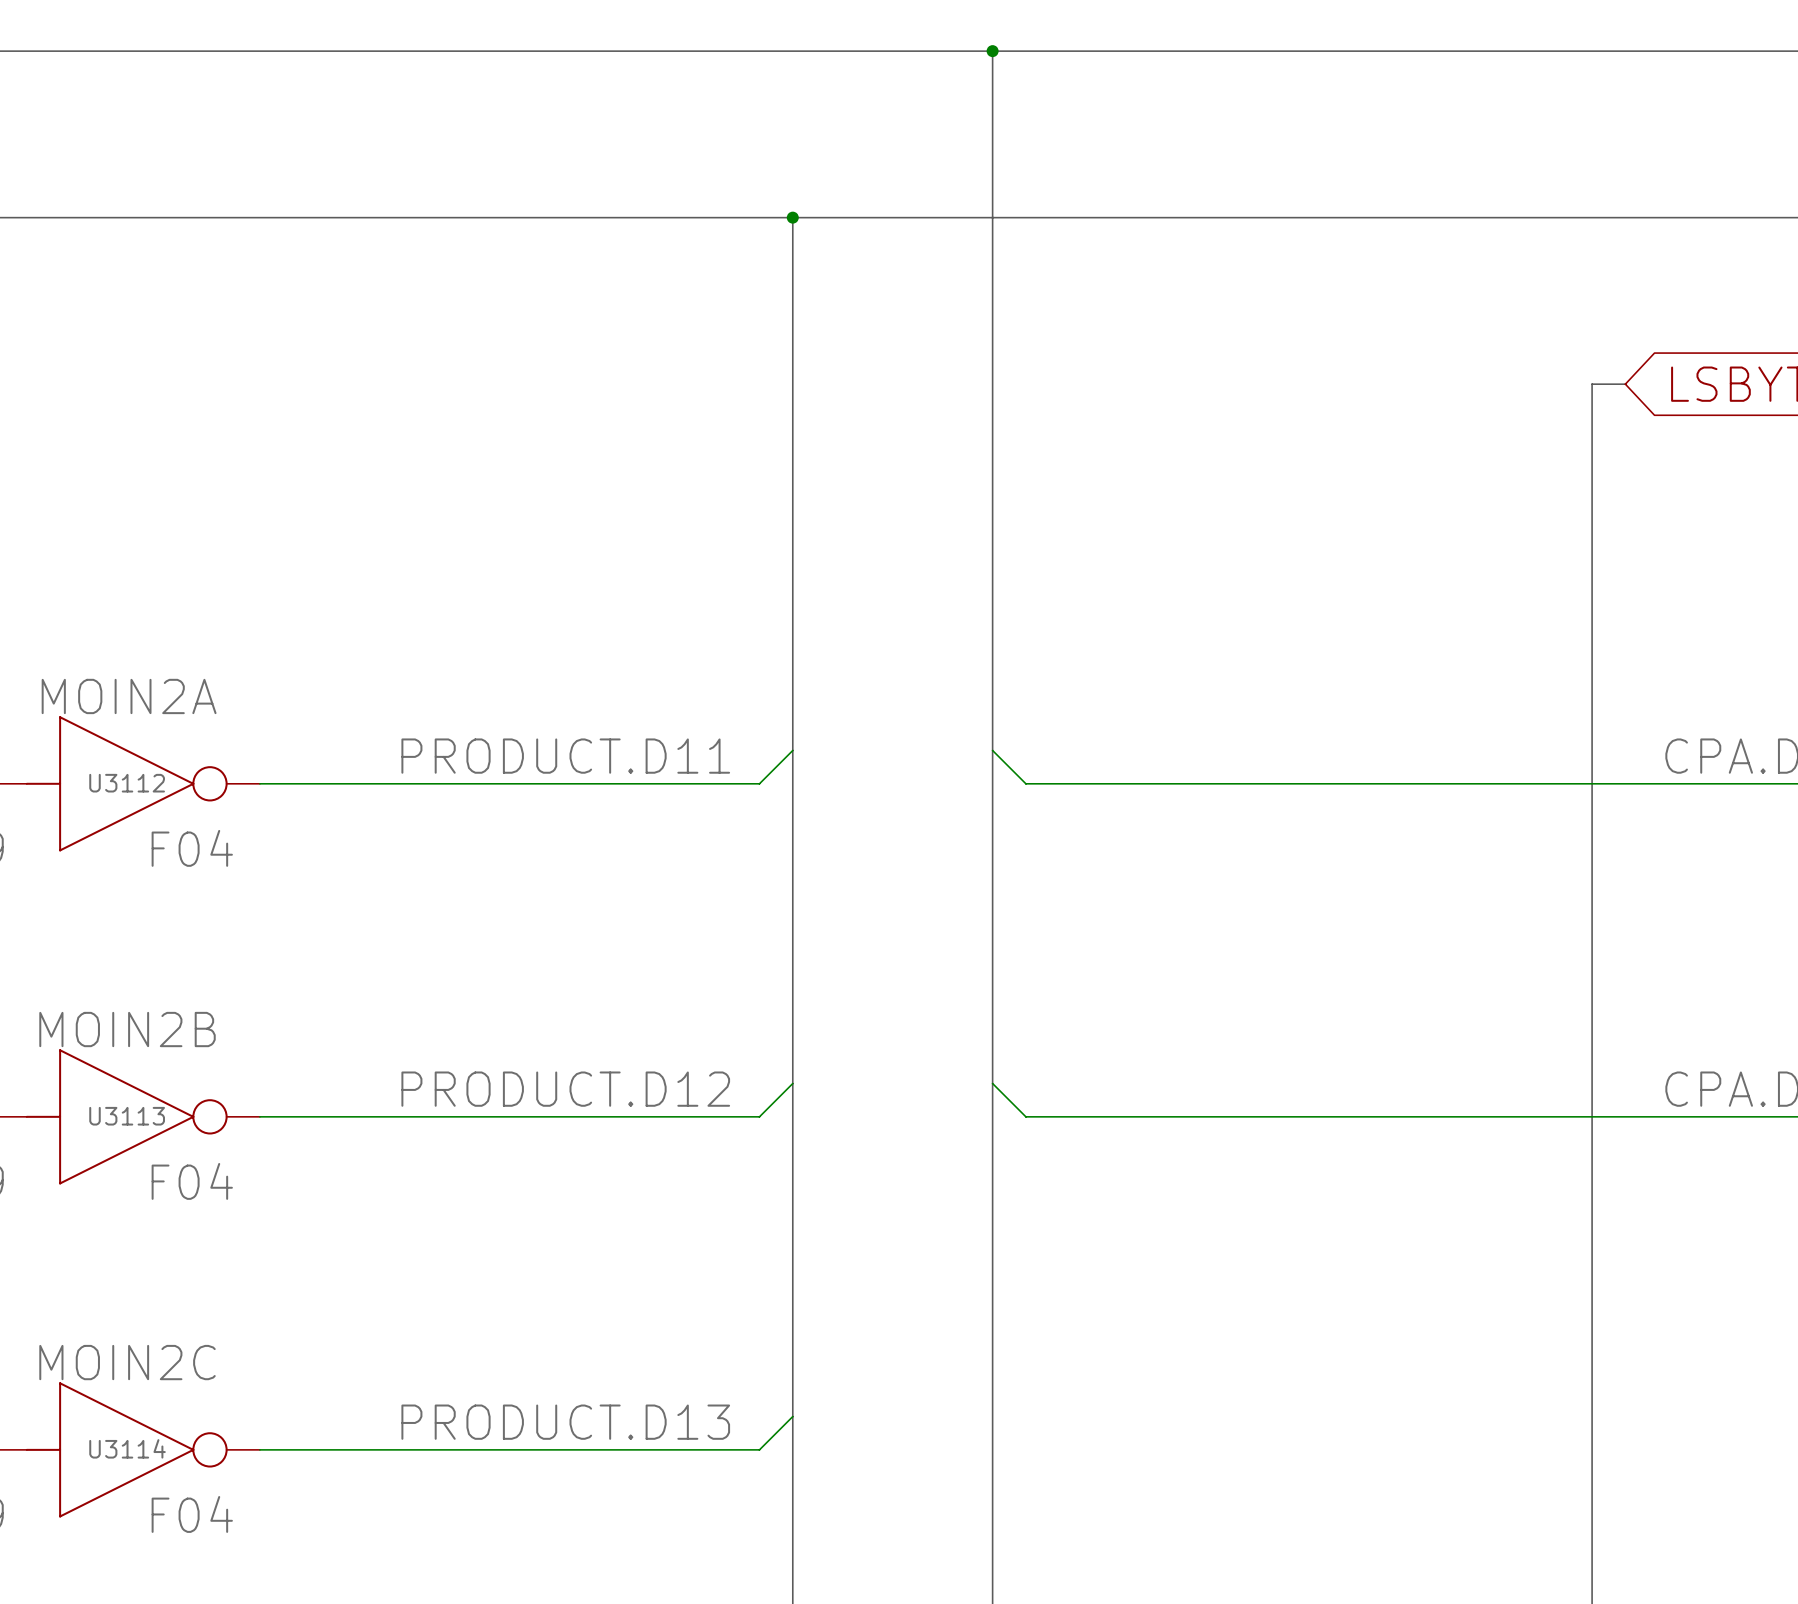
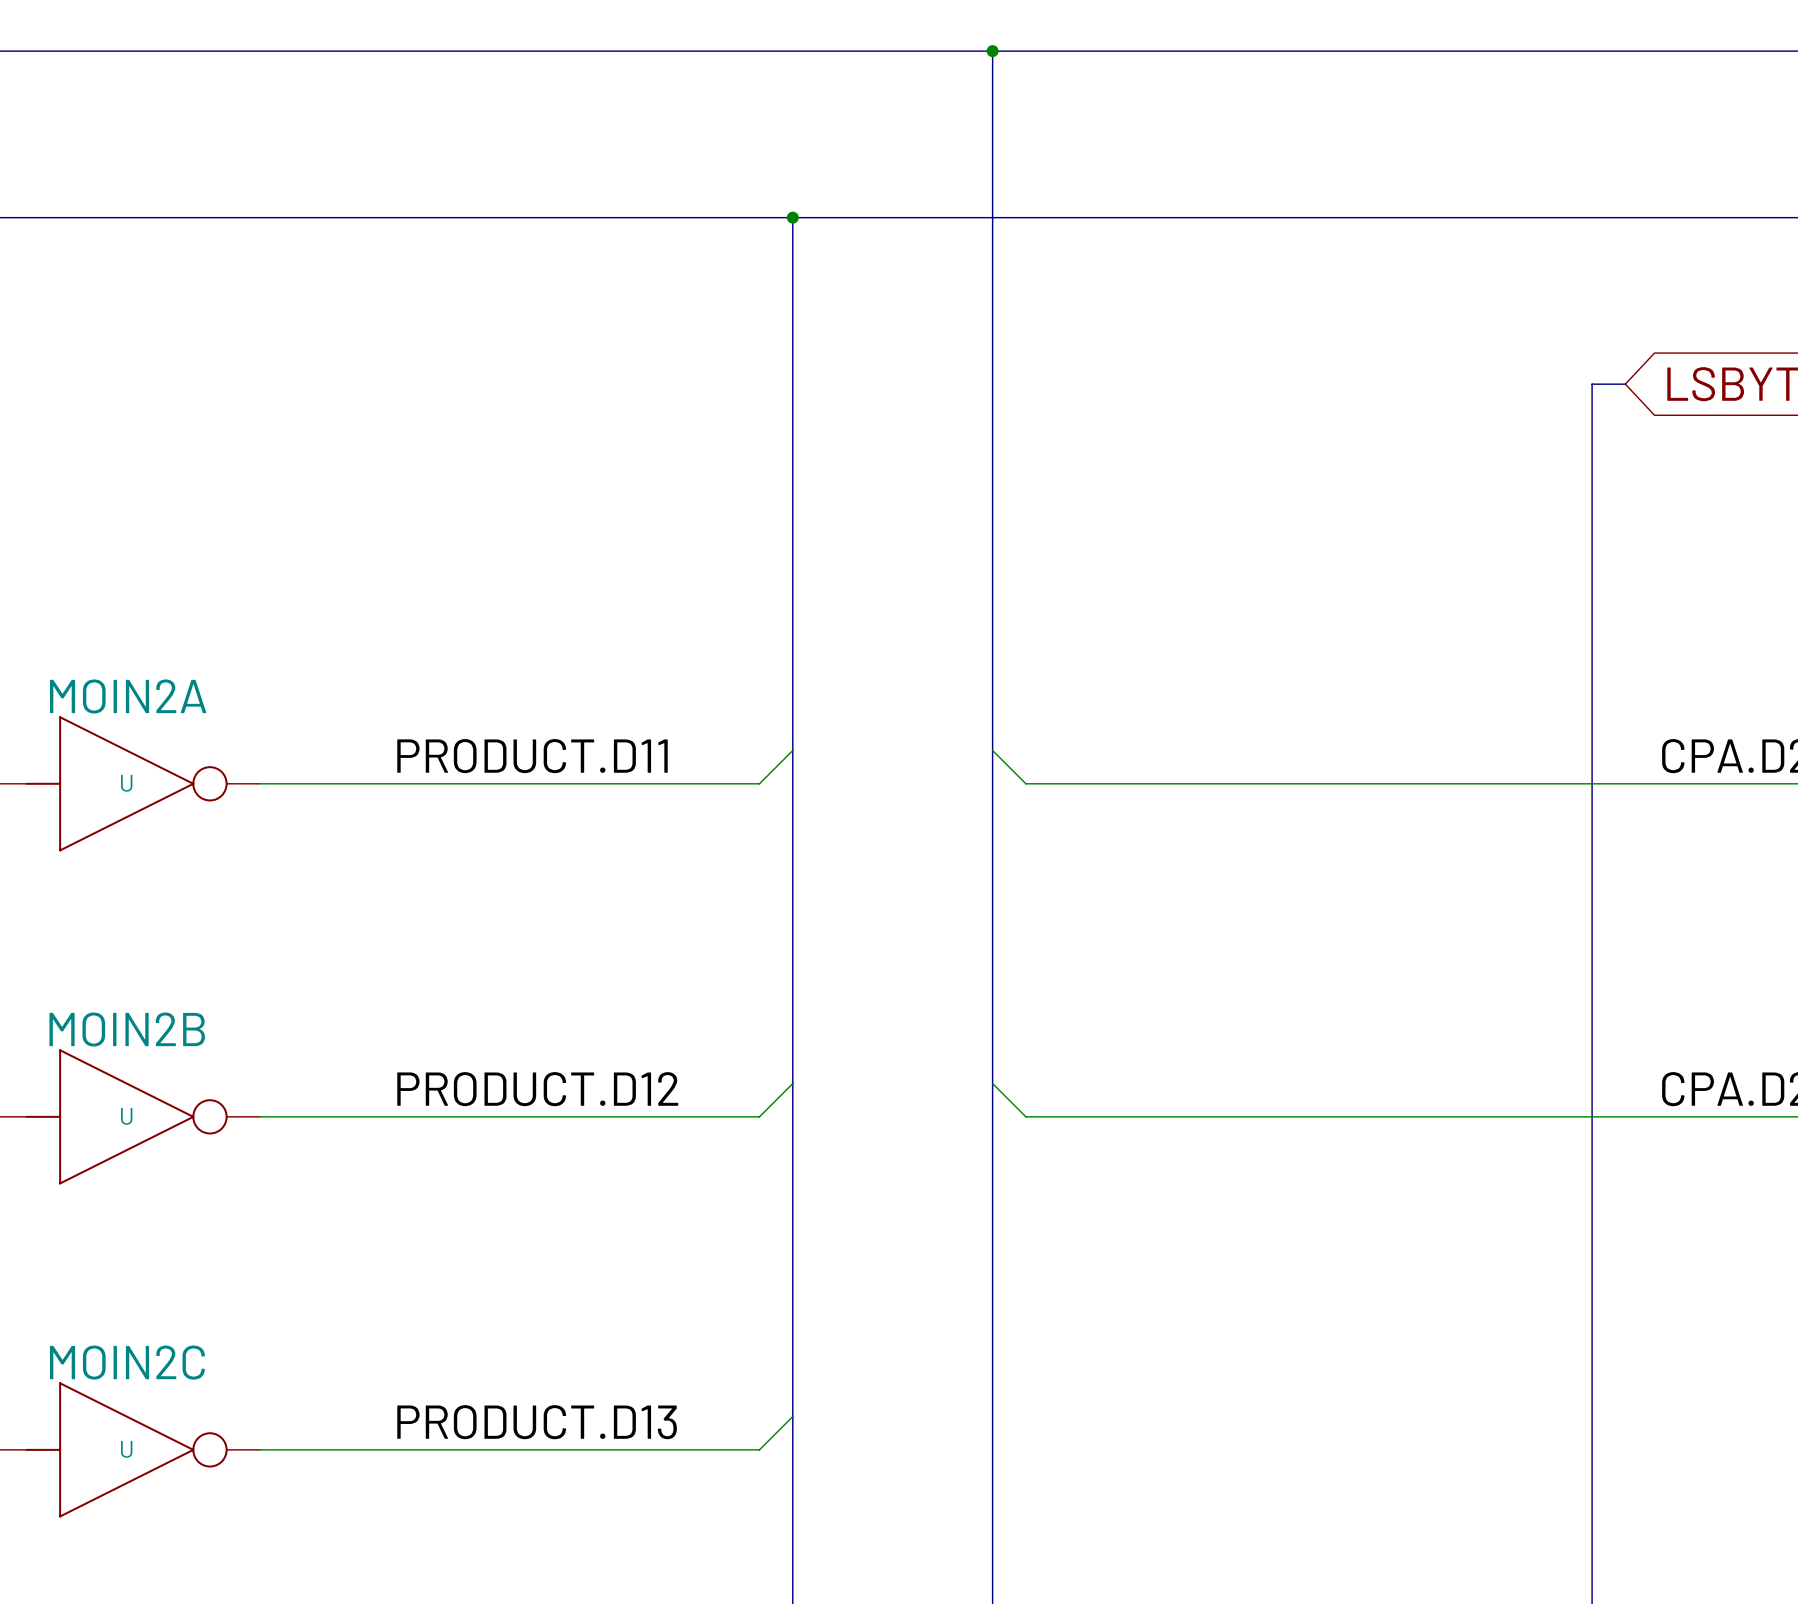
U3112 name: U3112 (127, 783) -> U (126, 783)
U3112 value: F04 (192, 848) -> none
U3113 name: U3113 (127, 1116) -> U (126, 1116)
U3113 value: F04 (192, 1181) -> none
U3114 name: U3114 (127, 1448) -> U (126, 1449)
U3114 value: F04 (192, 1514) -> none

